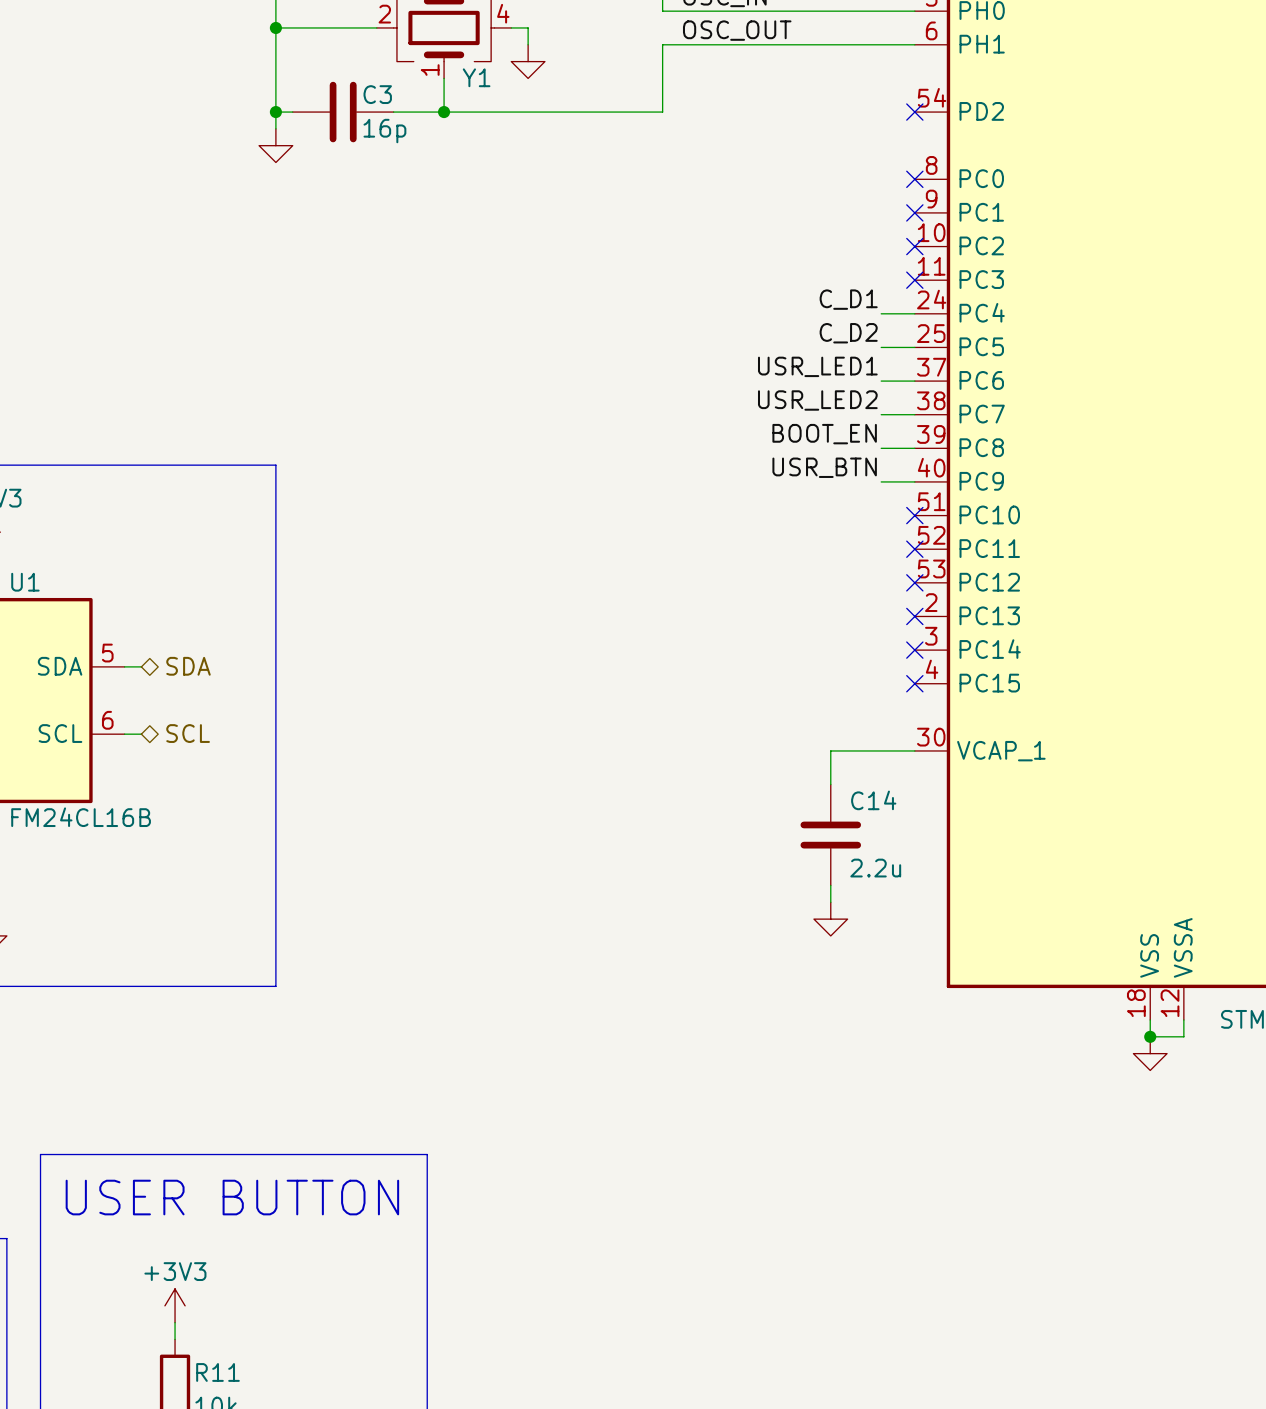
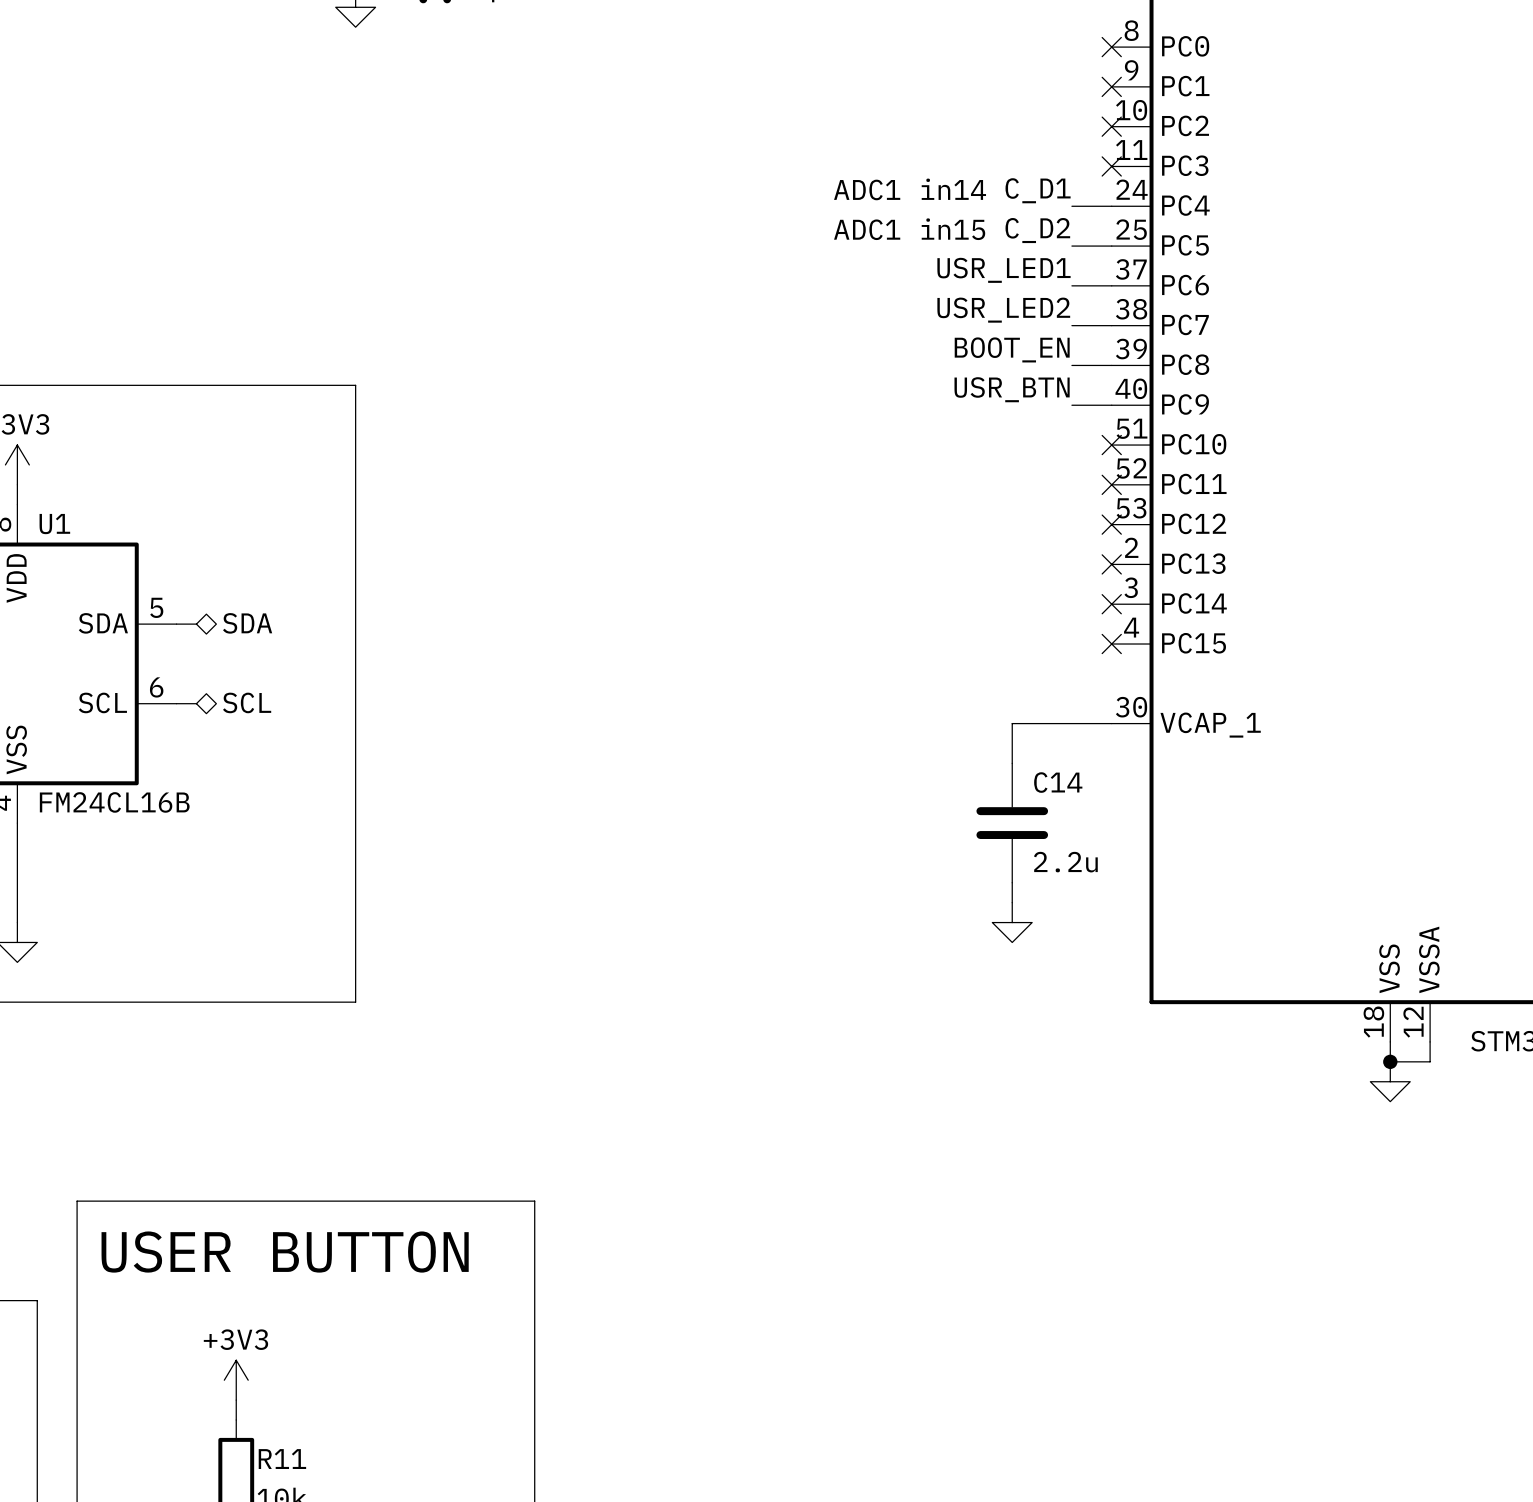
text: none -> ADC1 in14 (910, 189)
text: none -> ADC1 in15 (909, 229)

